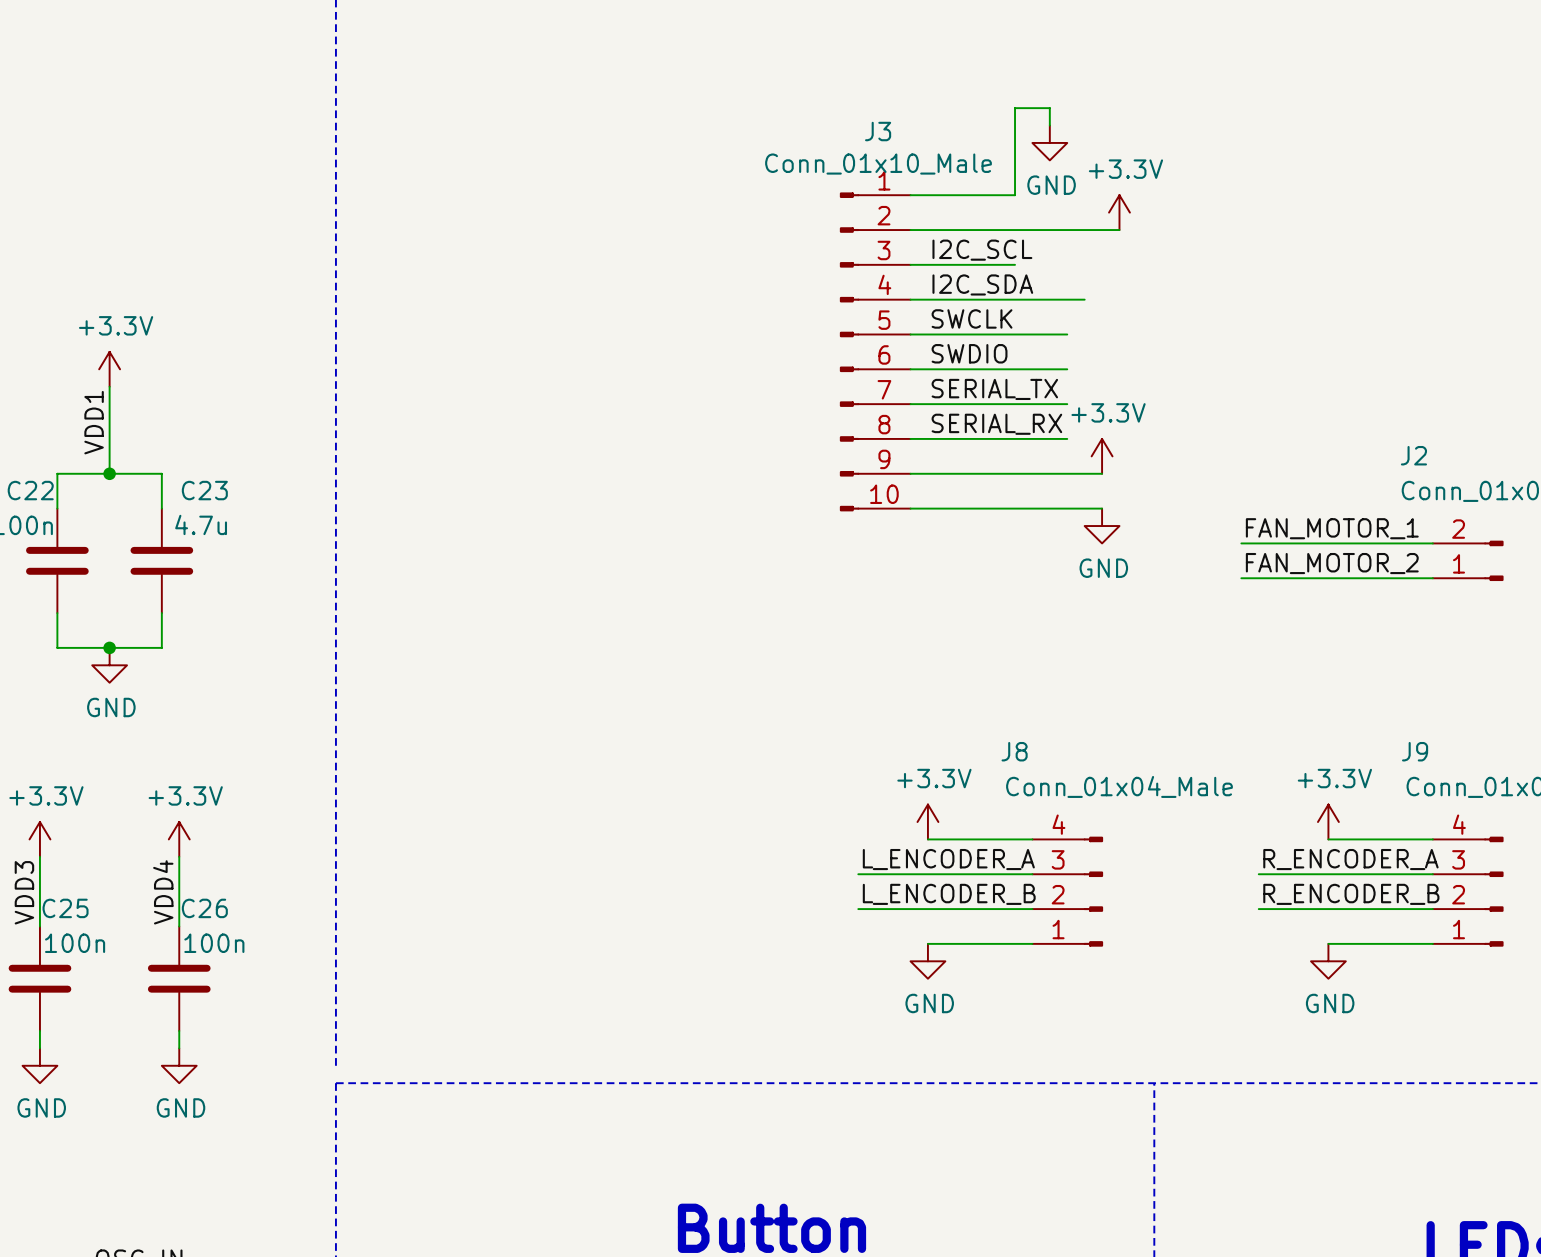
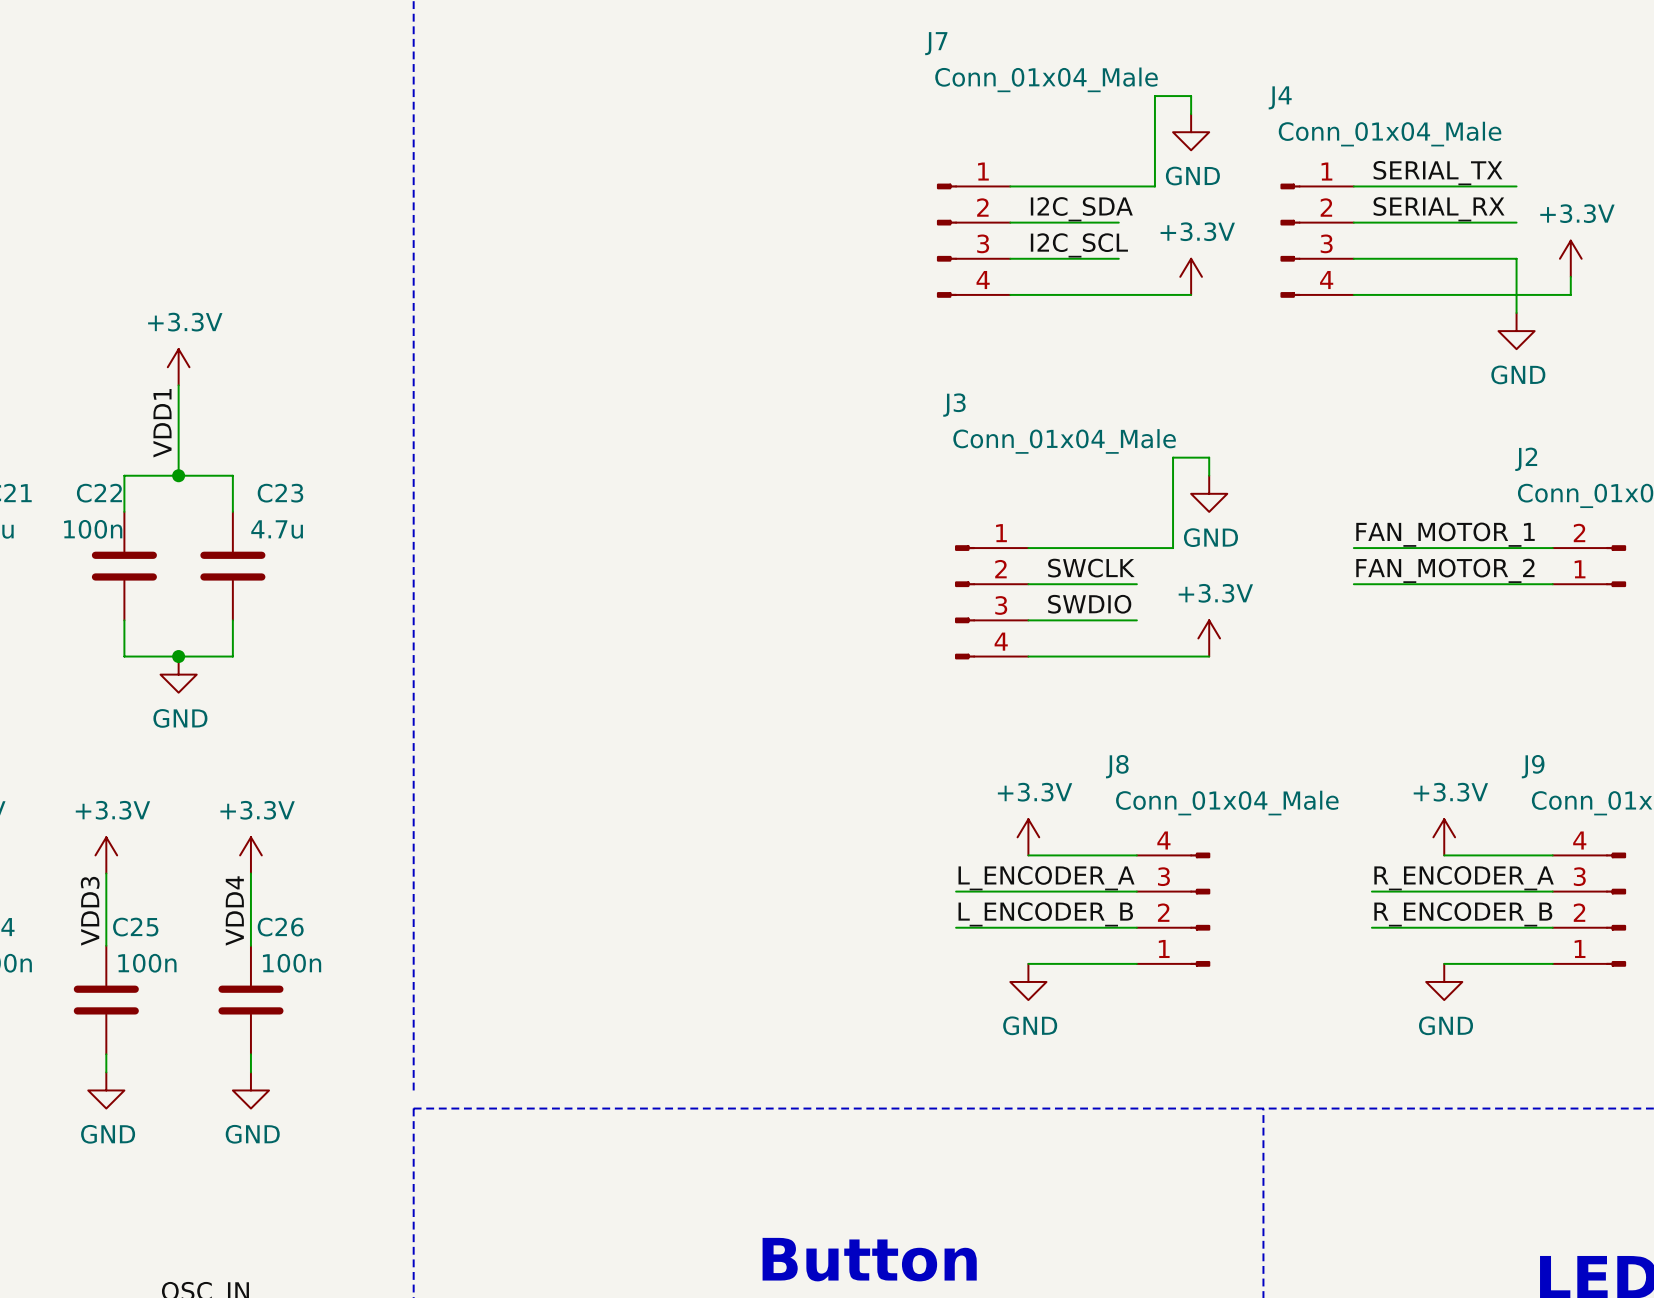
wire: (1049, 108) (1015, 108) (1015, 195) -> (1154, 114) (1154, 186) (1118, 186)
wire: none -> (1154, 96) (1191, 96) (1191, 114)
J3 name position: J3 (878, 131) -> J3 (954, 405)
power symbol position: GND (1049, 142) -> GND (1191, 132)
J3 value: Conn_01x10_Male (878, 164) -> Conn_01x04_Male (1064, 441)
label: none -> SERIAL_TX (1437, 173)
J3 symbol: [839, 192, 911, 512] -> [954, 545, 1029, 660]
wire: none -> (1353, 186) (1516, 186)
power symbol position: +3.3V (1119, 212) -> +3.3V (1191, 276)
label: none -> SERIAL_RX (1439, 209)
wire: (1015, 230) (1119, 230) -> none
wire: none -> (1353, 222) (1516, 222)
J7: none -> Conn_01x04_Male (973, 240)
J4: none -> Conn_01x04_Male (1317, 240)
wire: none -> (1353, 258) (1516, 258) (1516, 313)
power symbol: none -> +3.3V (1570, 258)
wire: none -> (1570, 276) (1570, 294) (1353, 294)
label position: I2C_SDA (982, 284) -> I2C_SDA (1081, 209)
label position: SWCLK (972, 318) -> SWCLK (1091, 568)
wire: (910, 334) (1067, 334) -> none
power symbol: none -> GND (1516, 331)
label position: SWDIO (969, 353) -> SWDIO (1089, 604)
wire: (910, 369) (1067, 369) -> none
label: SERIAL_TX (994, 389) -> none
wire: (910, 404) (1067, 404) -> none
label: SERIAL_RX (996, 424) -> none
wire: (910, 438) (1067, 438) -> none
power symbol: +3.3V (1102, 456) -> none
wire: (910, 473) (1102, 473) -> (1028, 548) (1173, 548) (1173, 457) (1209, 457) (1209, 475)
wire: (910, 508) (1102, 508) -> none
power symbol position: GND (1102, 526) -> GND (1209, 493)
wire: none -> (1028, 584) (1136, 584)
wire: none -> (1028, 620) (1136, 620)
power symbol: none -> +3.3V (1209, 638)
wire: none -> (1028, 656) (1209, 656)

